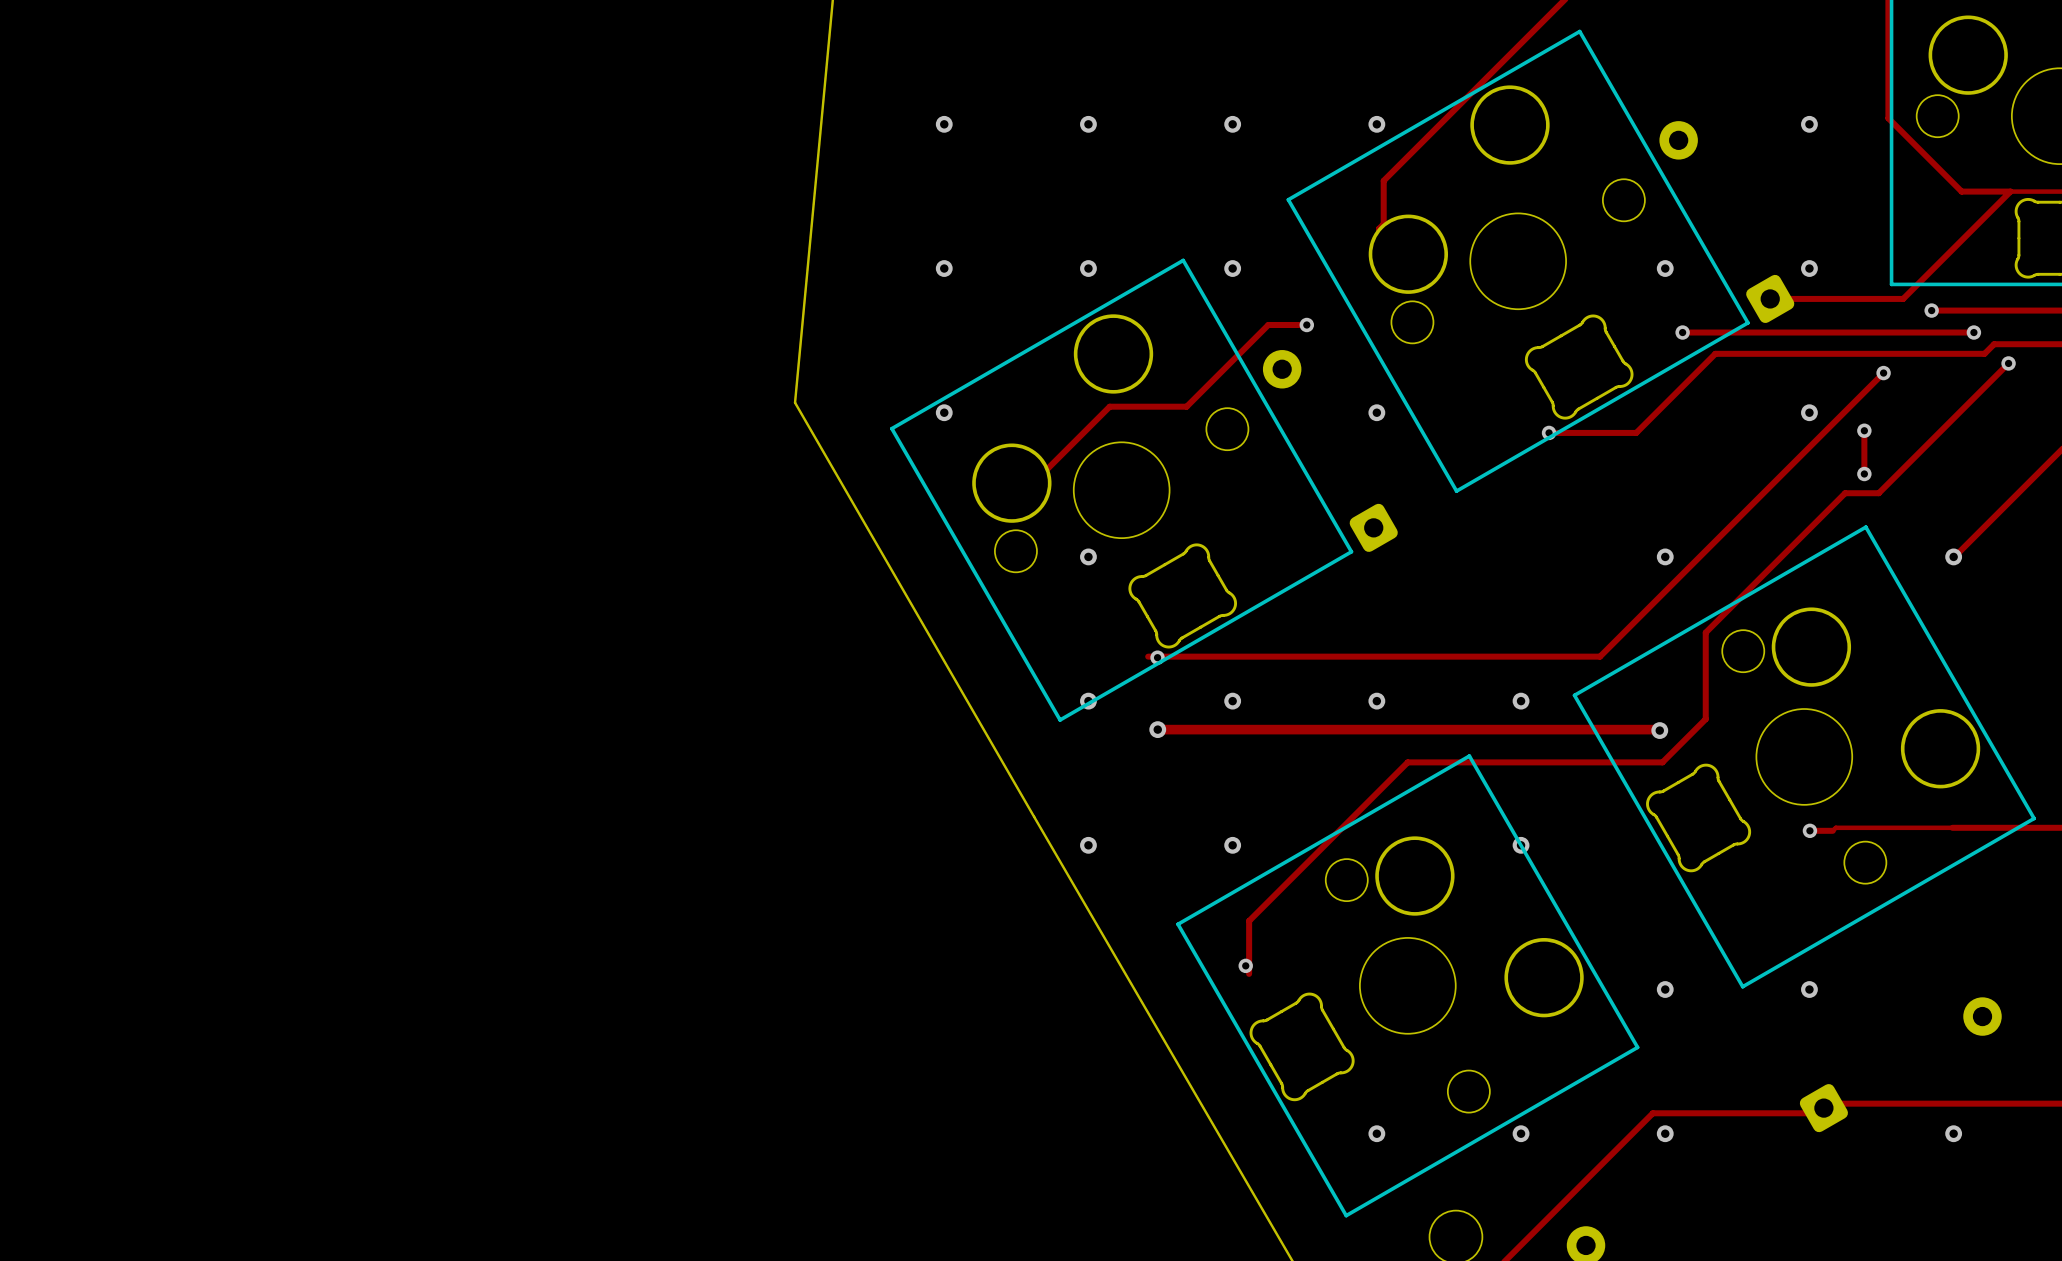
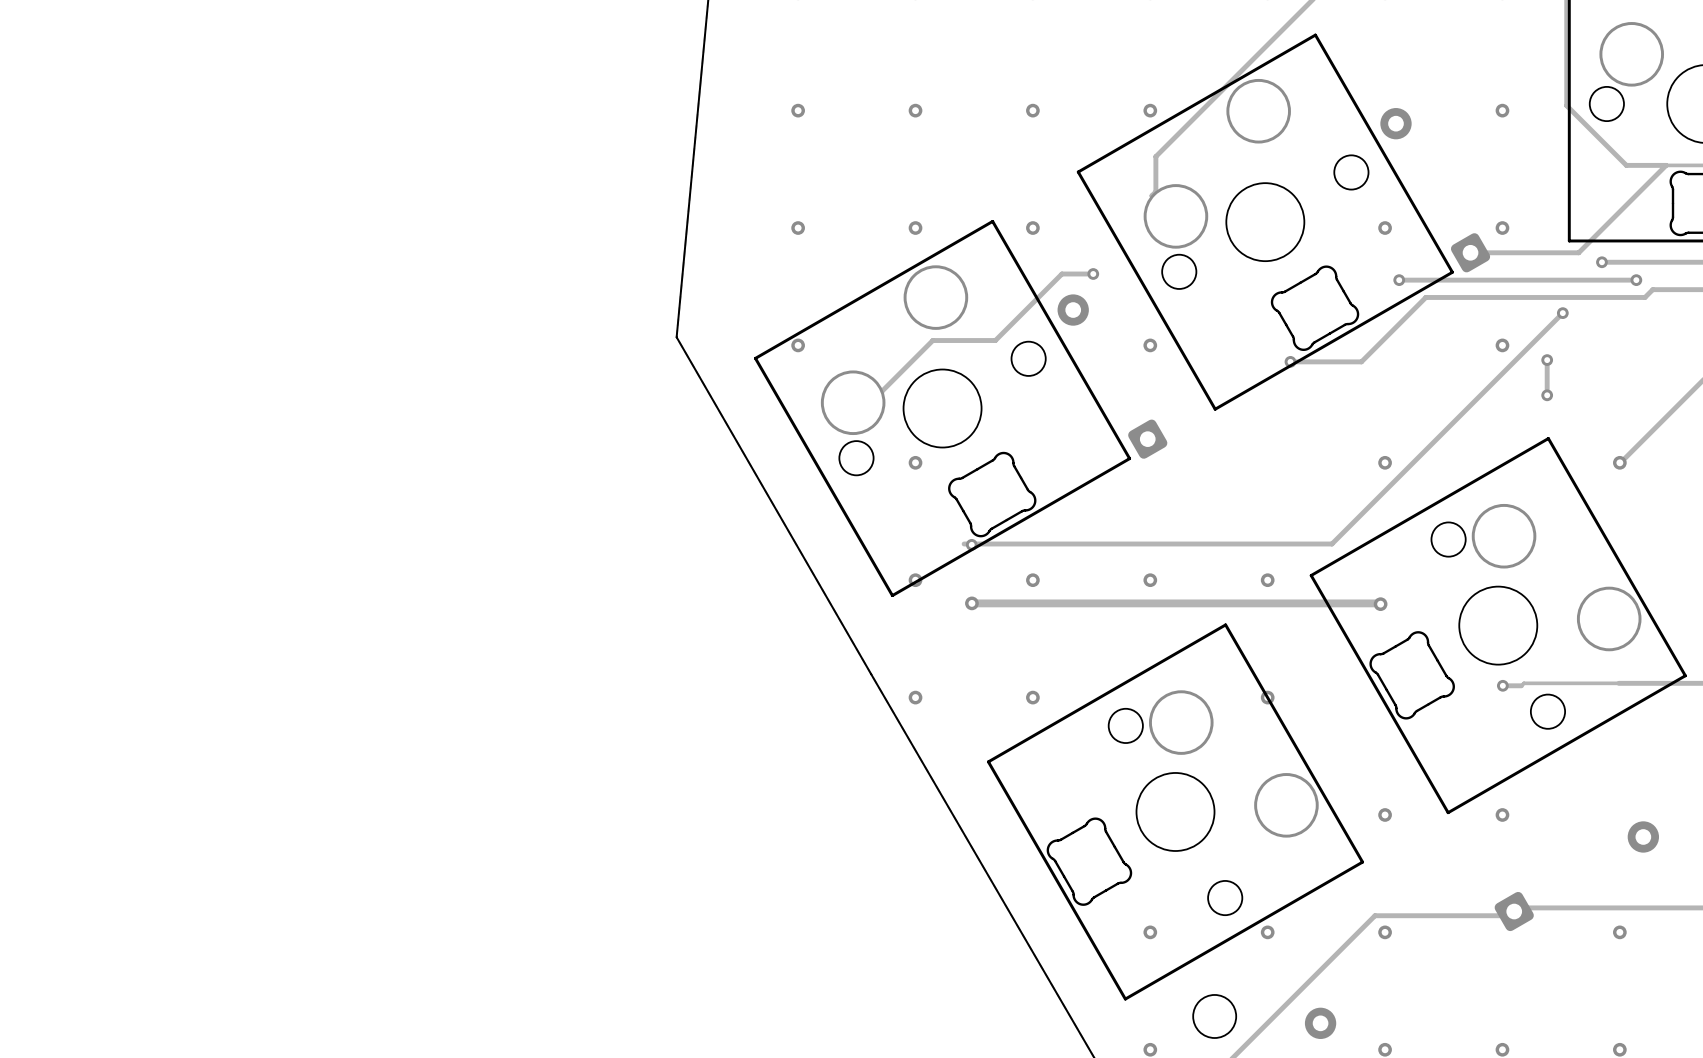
track: (2008, 363) (1878, 493) (1845, 493) (1705, 632) (1705, 719) (1662, 762) (1407, 762) (1249, 921) (1249, 973) -> none
via: (2008, 363) -> none
via: (1245, 965) -> none

